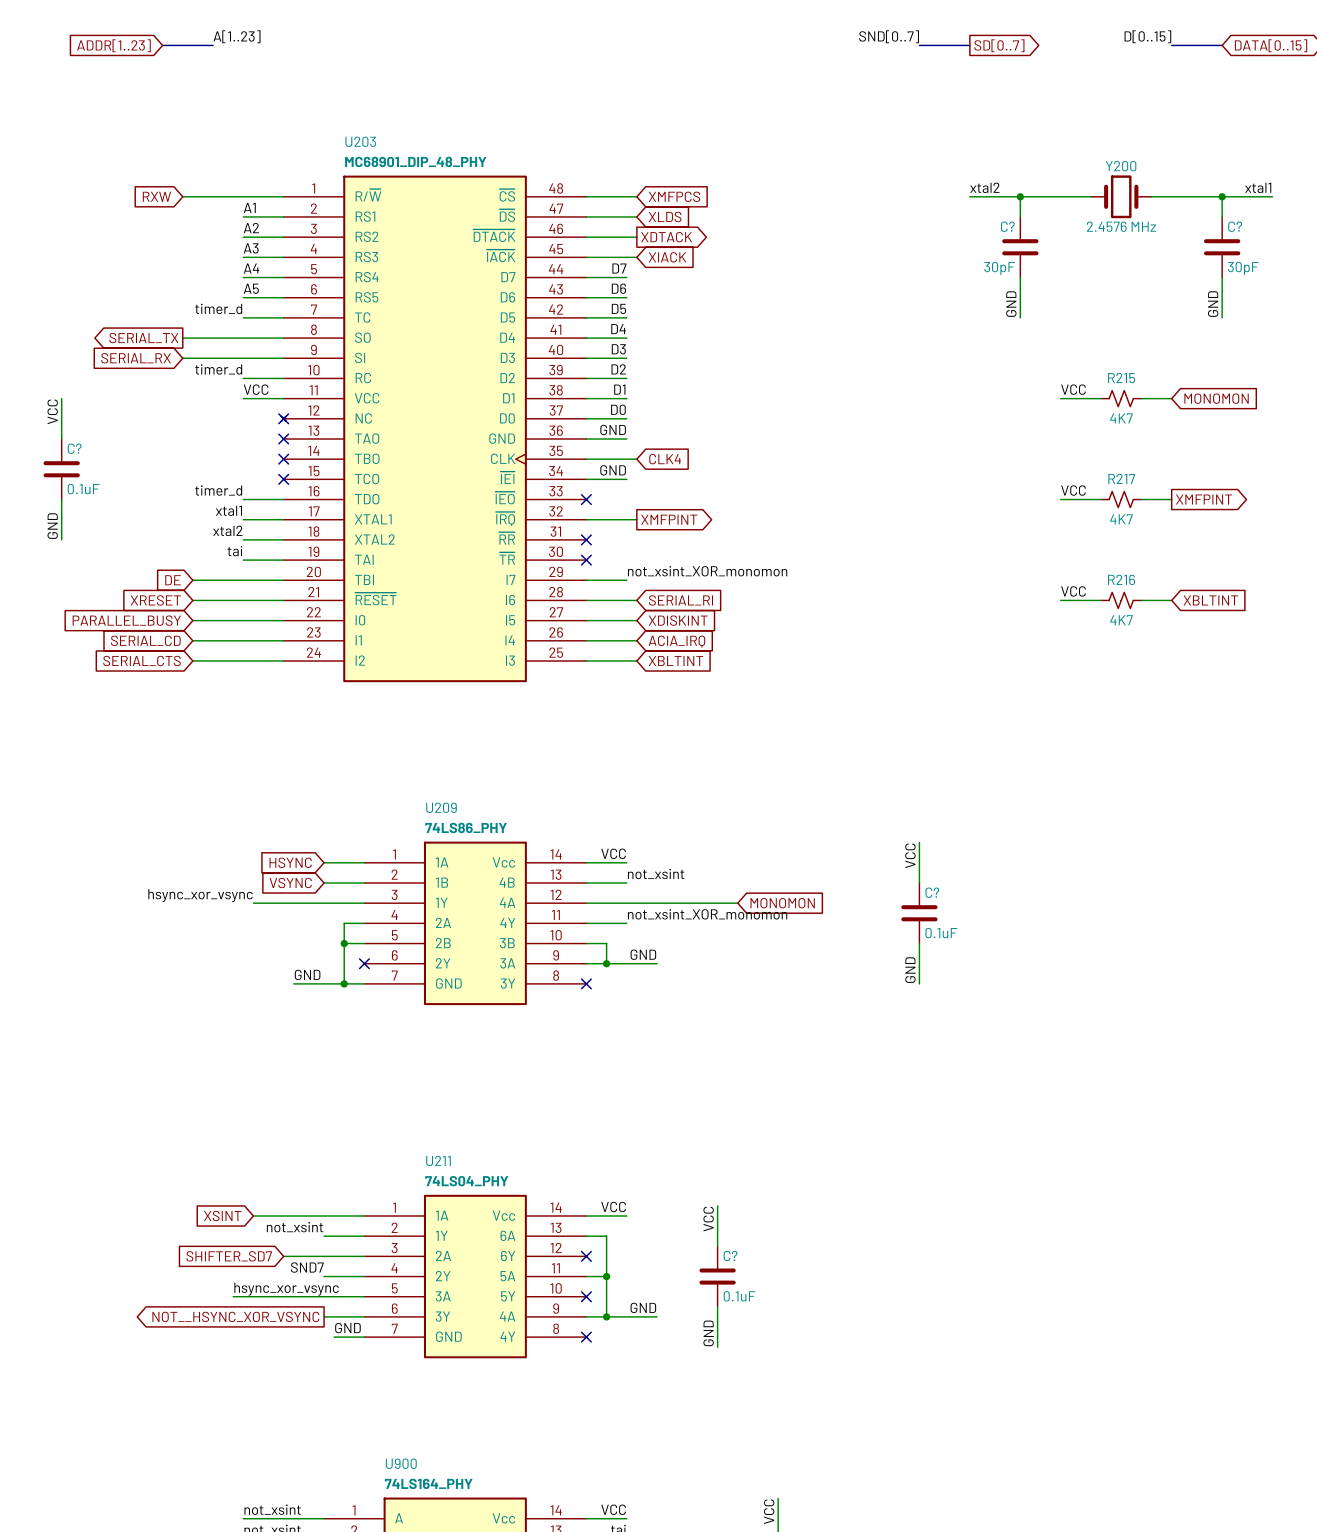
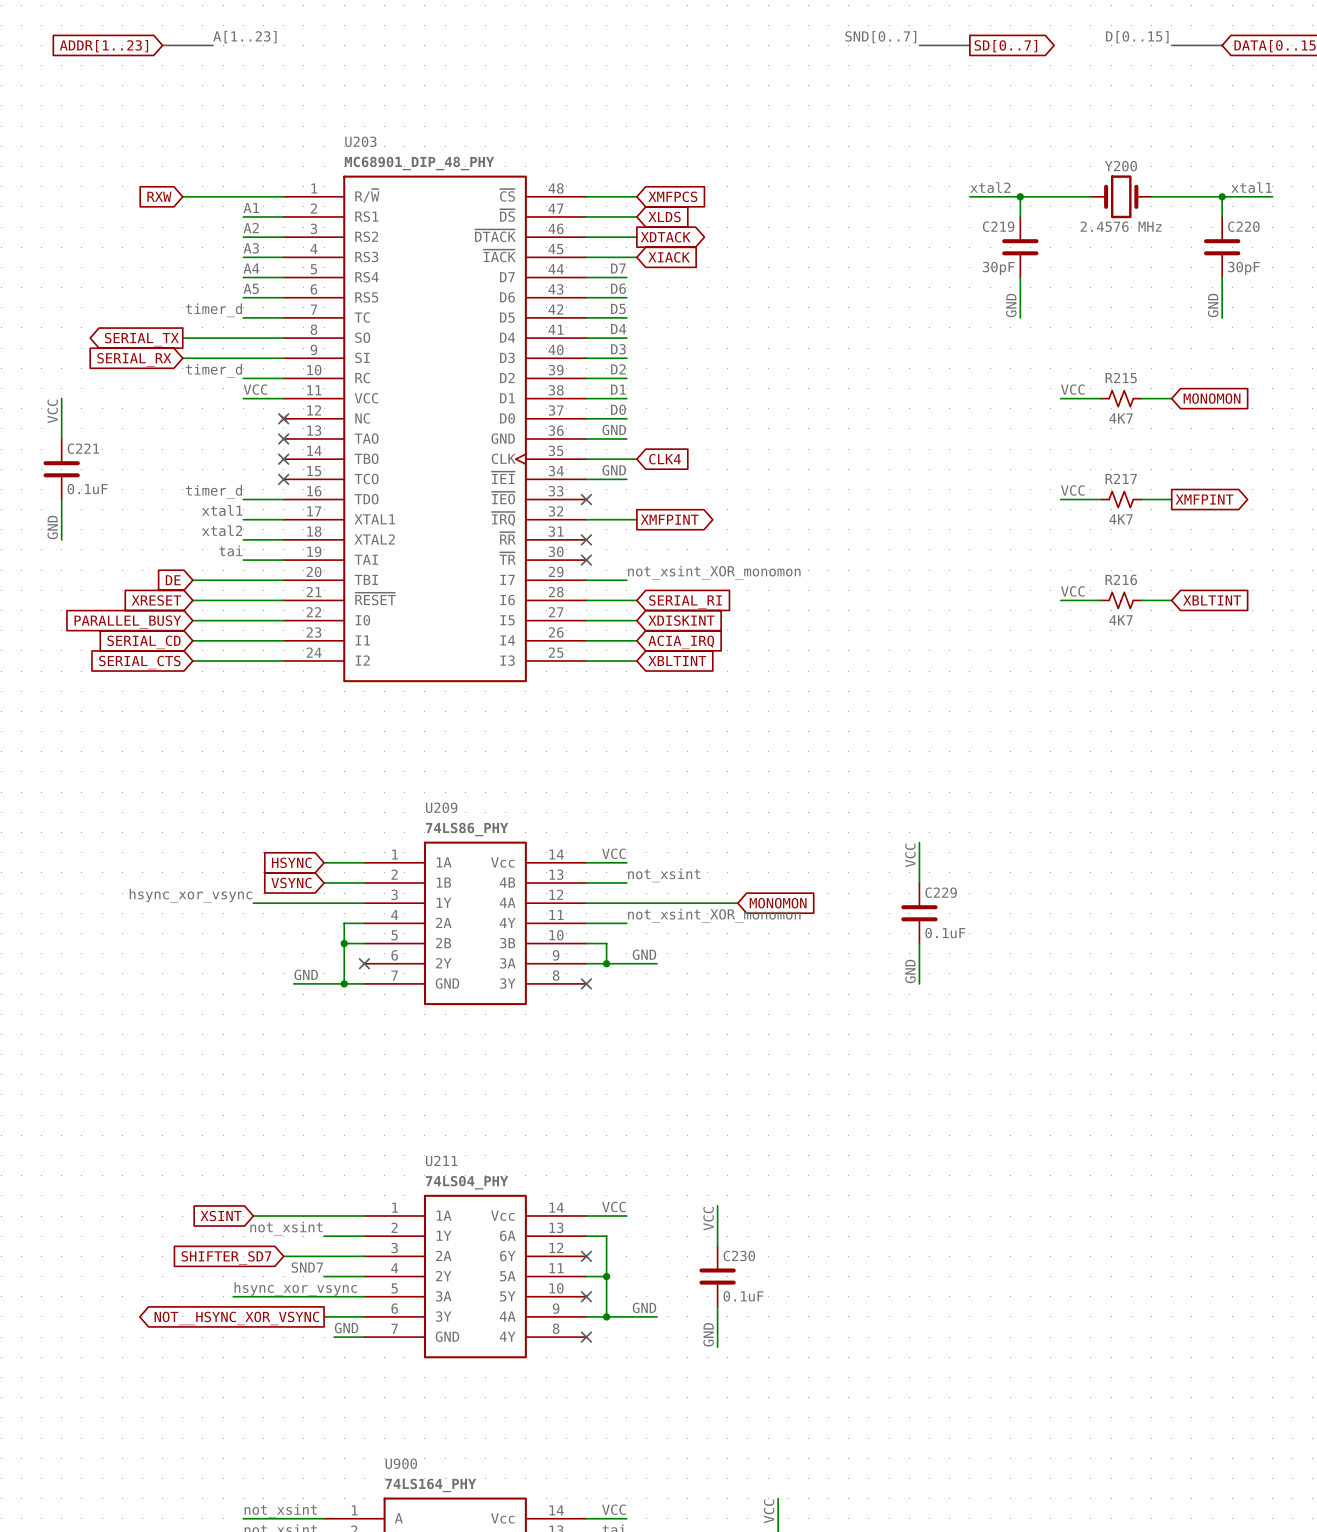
C? name: C? (1007, 226) -> C219 (998, 226)
C? name: C? (1235, 226) -> C220 (1243, 226)
C? name: C? (74, 448) -> C221 (83, 448)
C? name: C? (932, 892) -> C229 (941, 892)
C? name: C? (730, 1255) -> C230 (739, 1255)

